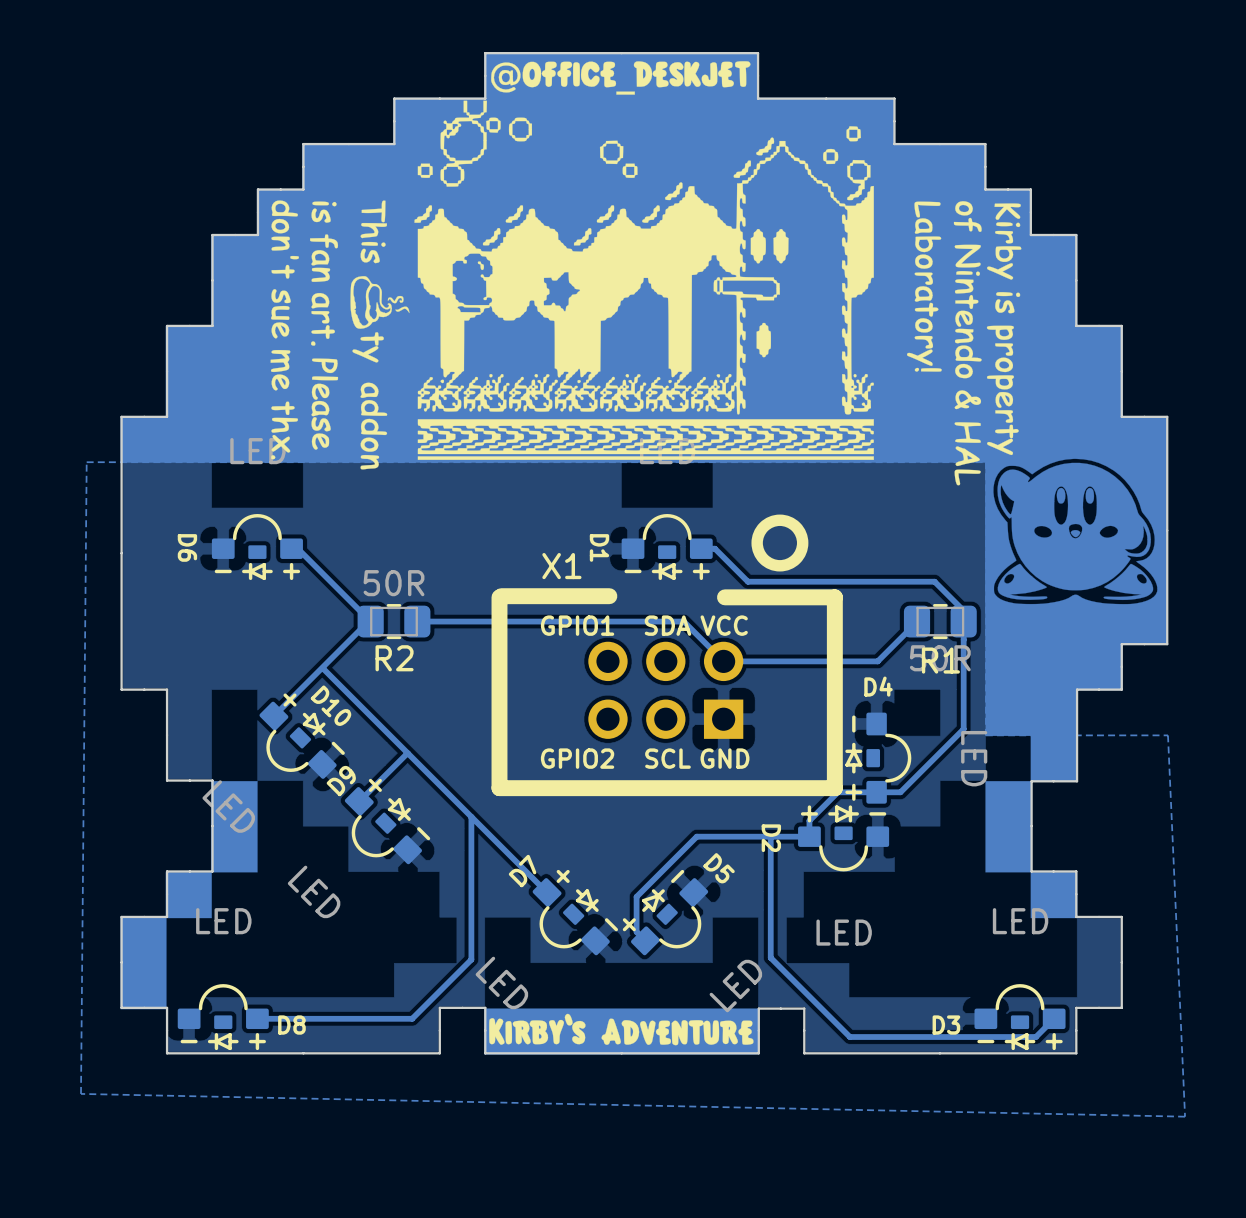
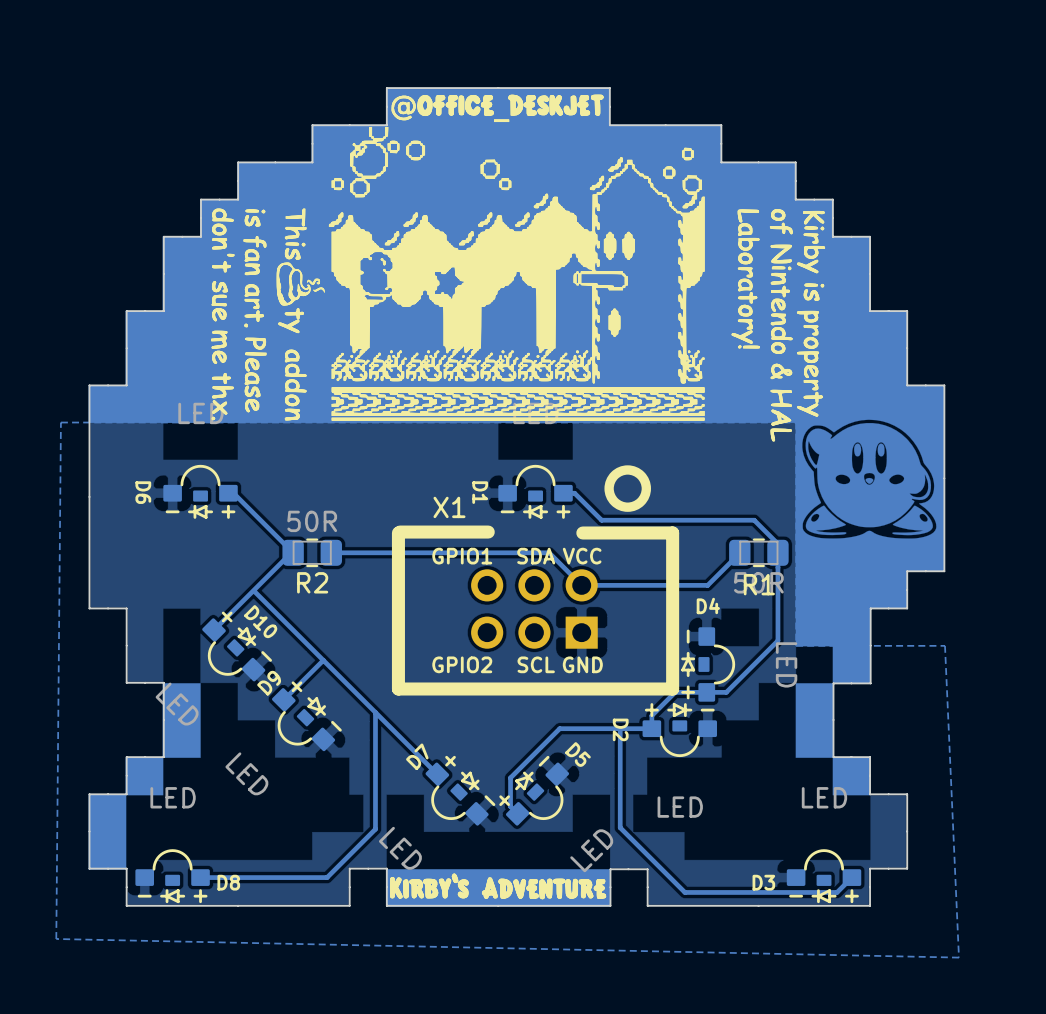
drawing shape: [270, 61, 1022, 1046] -> [211, 94, 826, 900]

